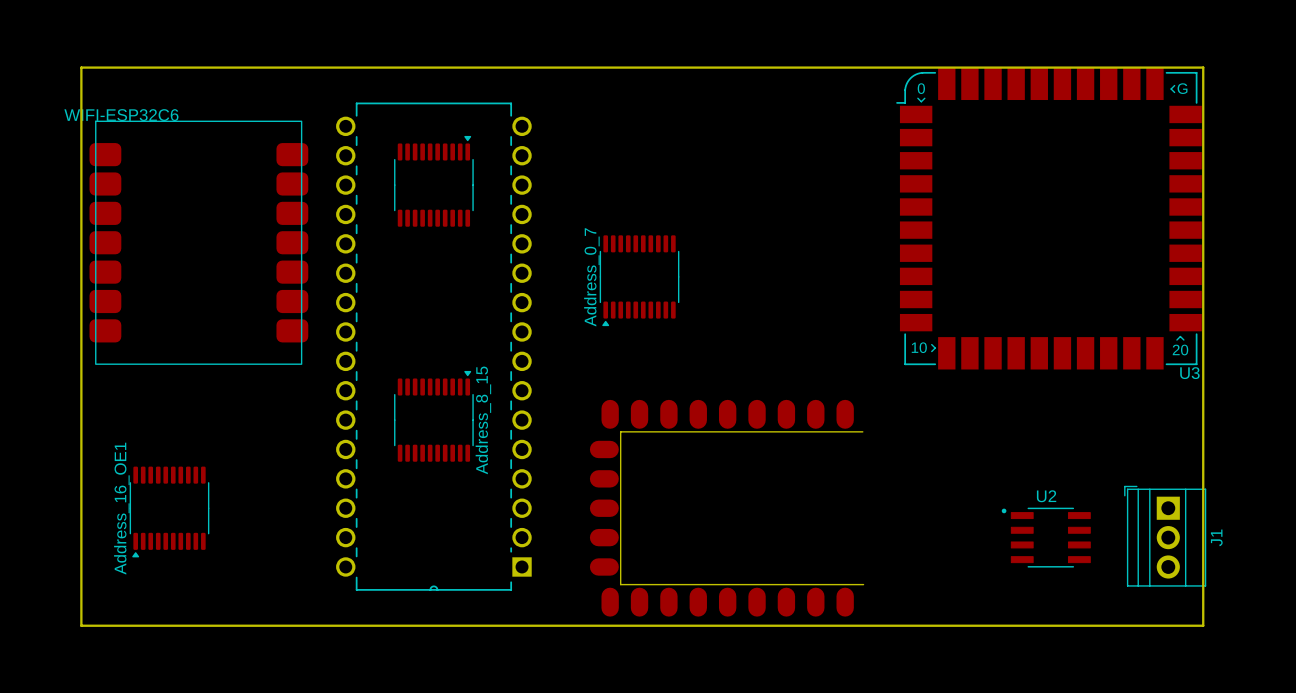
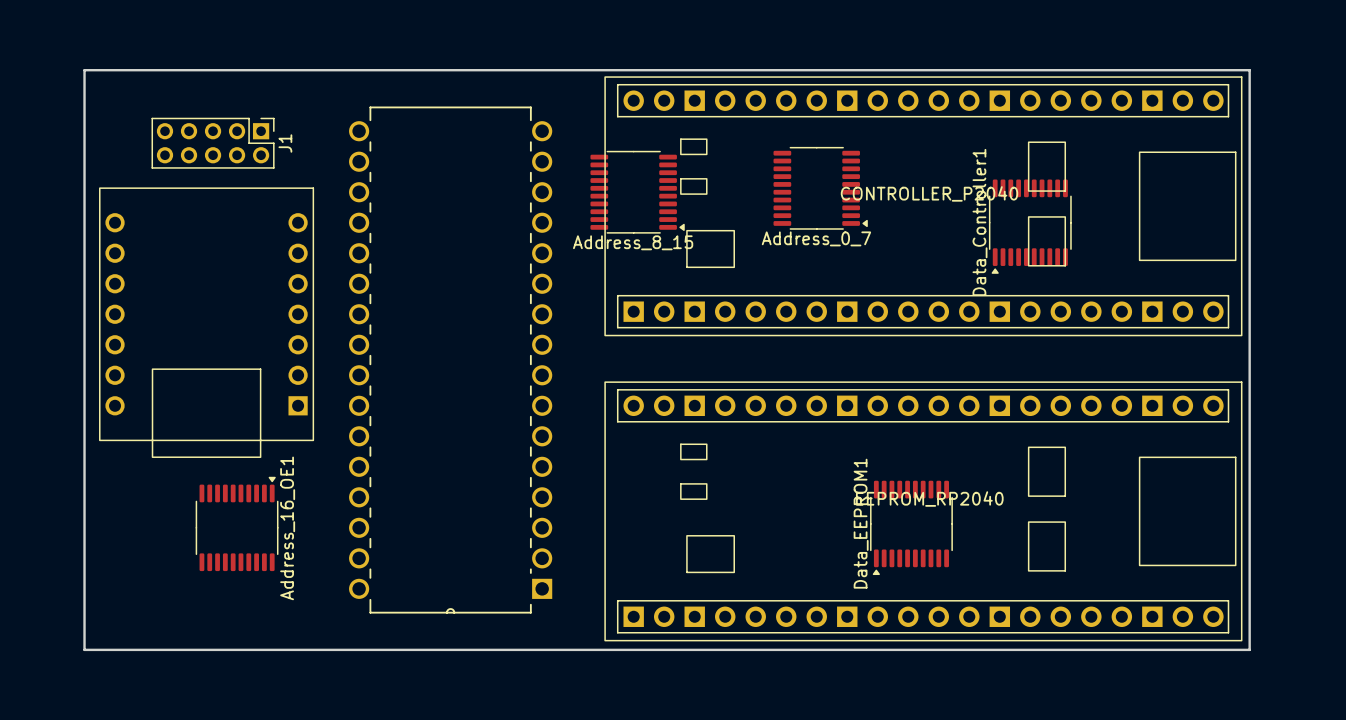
part: (433, 181) -> none
CONTROLLER_P2040: none -> (923, 206)
Data_Controller1: none -> (1030, 226)
U3: (1048, 218) -> none
WIFI-ESP32C6: (198, 242) -> none
Address_0_7 rotation: 0° (639, 280) -> 90° counterclockwise (820, 188)
Address_0_7 position: (639, 280) -> (820, 188)
part: none -> (206, 322)
Address_8_15 rotation: 0° (433, 416) -> 90° clockwise (637, 192)
Address_8_15 position: (433, 416) -> (637, 192)
J1 footprint: [1124, 485, 1207, 587] -> [151, 117, 275, 169]
EEPROM_RP2040: none -> (923, 511)
part: (727, 508) -> none
Data_EEPROM1: none -> (911, 527)
Address_16_OE1 rotation: 0° (169, 511) -> 180° (237, 523)
Address_16_OE1 position: (169, 511) -> (237, 523)
U2: (1046, 537) -> none

